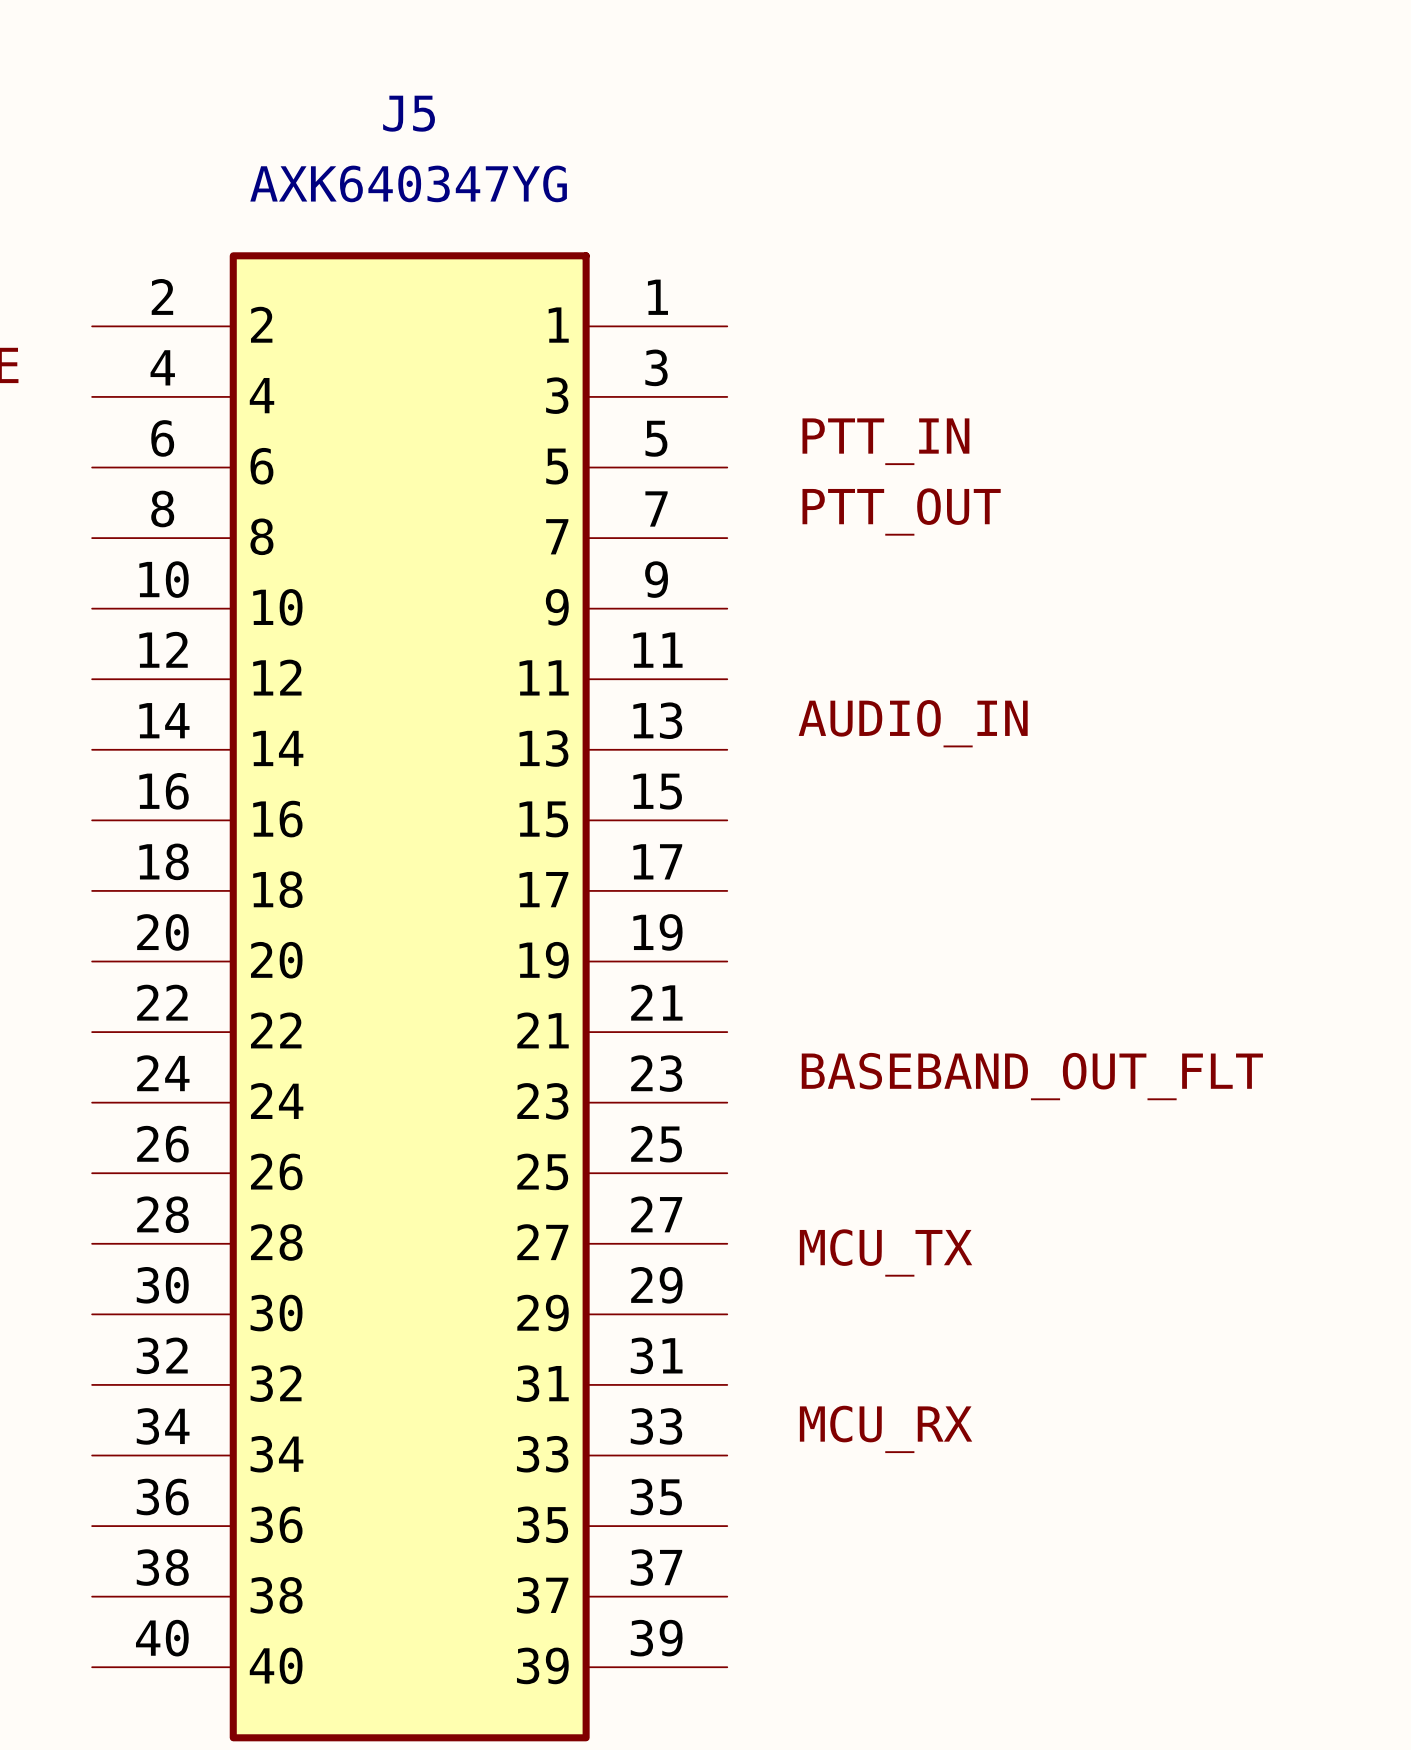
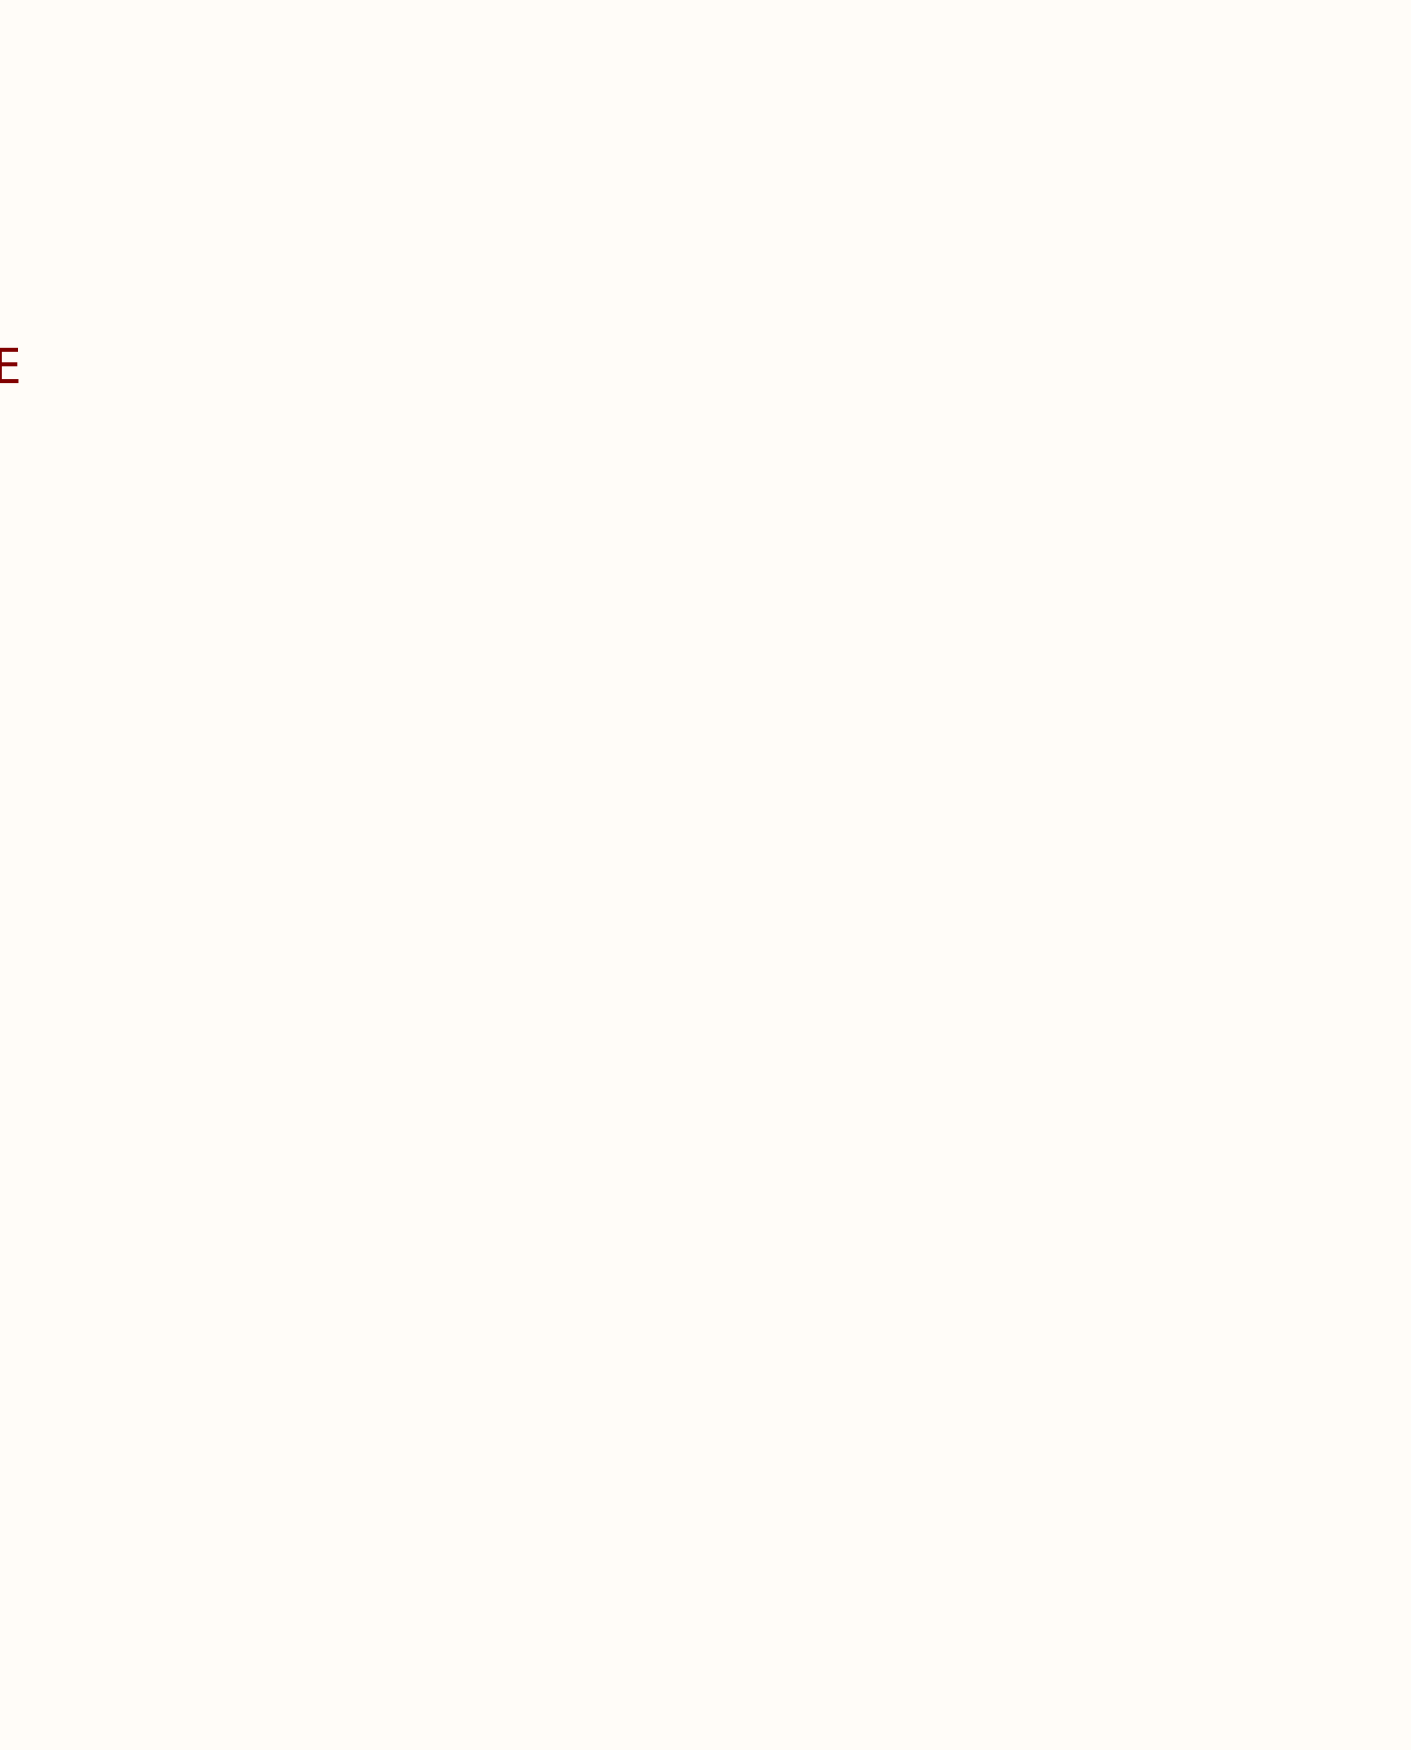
label: PTT_IN (885, 441) -> none
label: PTT_OUT (901, 511) -> none
label: AUDIO_IN (913, 723) -> none
J5: AXK640347YG (409, 996) -> none
label: BASEBAND_OUT_FLT (1032, 1076) -> none
label: MCU_TX (886, 1252) -> none
label: MCU_RX (886, 1429) -> none

